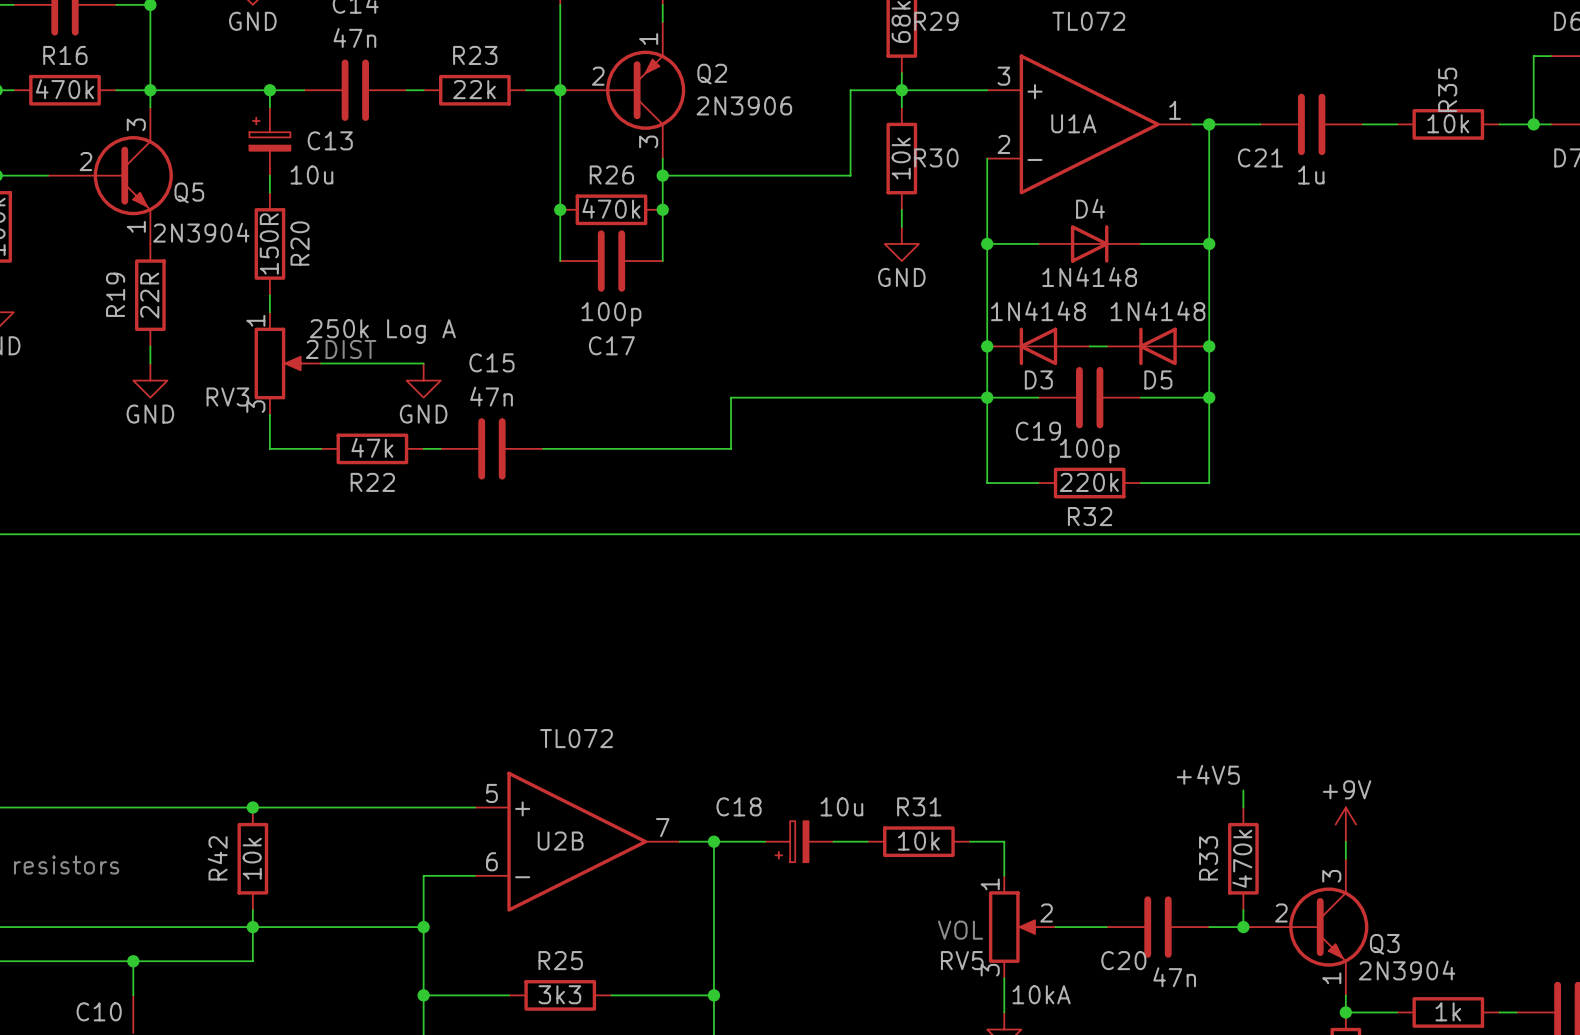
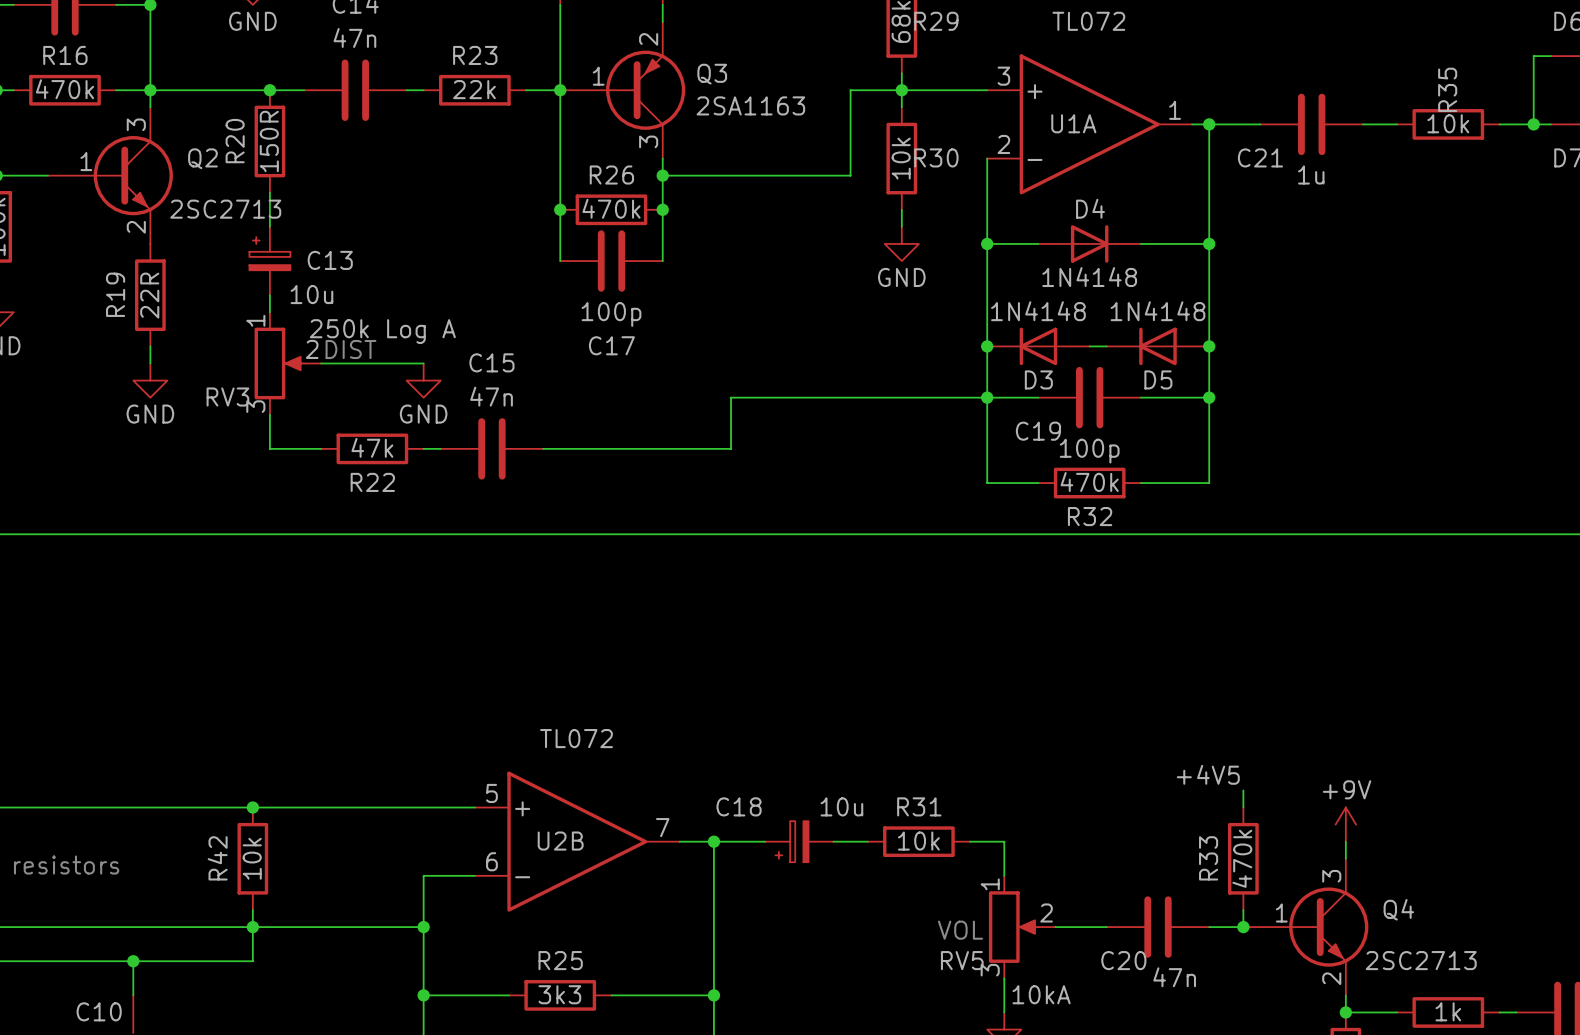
Q2 symbol: [560, 21, 686, 159] -> [47, 107, 173, 244]
Q2 value: 2N3906 (744, 105) -> 2SC2713 (225, 209)
C13 position: (269, 141) -> (269, 261)
Q5: 2N3904 (110, 175) -> none
R20 position: (269, 243) -> (269, 141)
R20 name position: R20 (300, 243) -> R20 (235, 141)
R32 value: 220k (1089, 482) -> 470k (1089, 482)
Q3 symbol: [1243, 858, 1369, 996] -> [560, 21, 686, 159]
Q4: none -> 2SC2713 (1305, 927)
Q3 name position: Q3 (1384, 944) -> Q3 (712, 74)
Q3 value: 2N3904 (1407, 970) -> 2SA1163 (750, 105)

